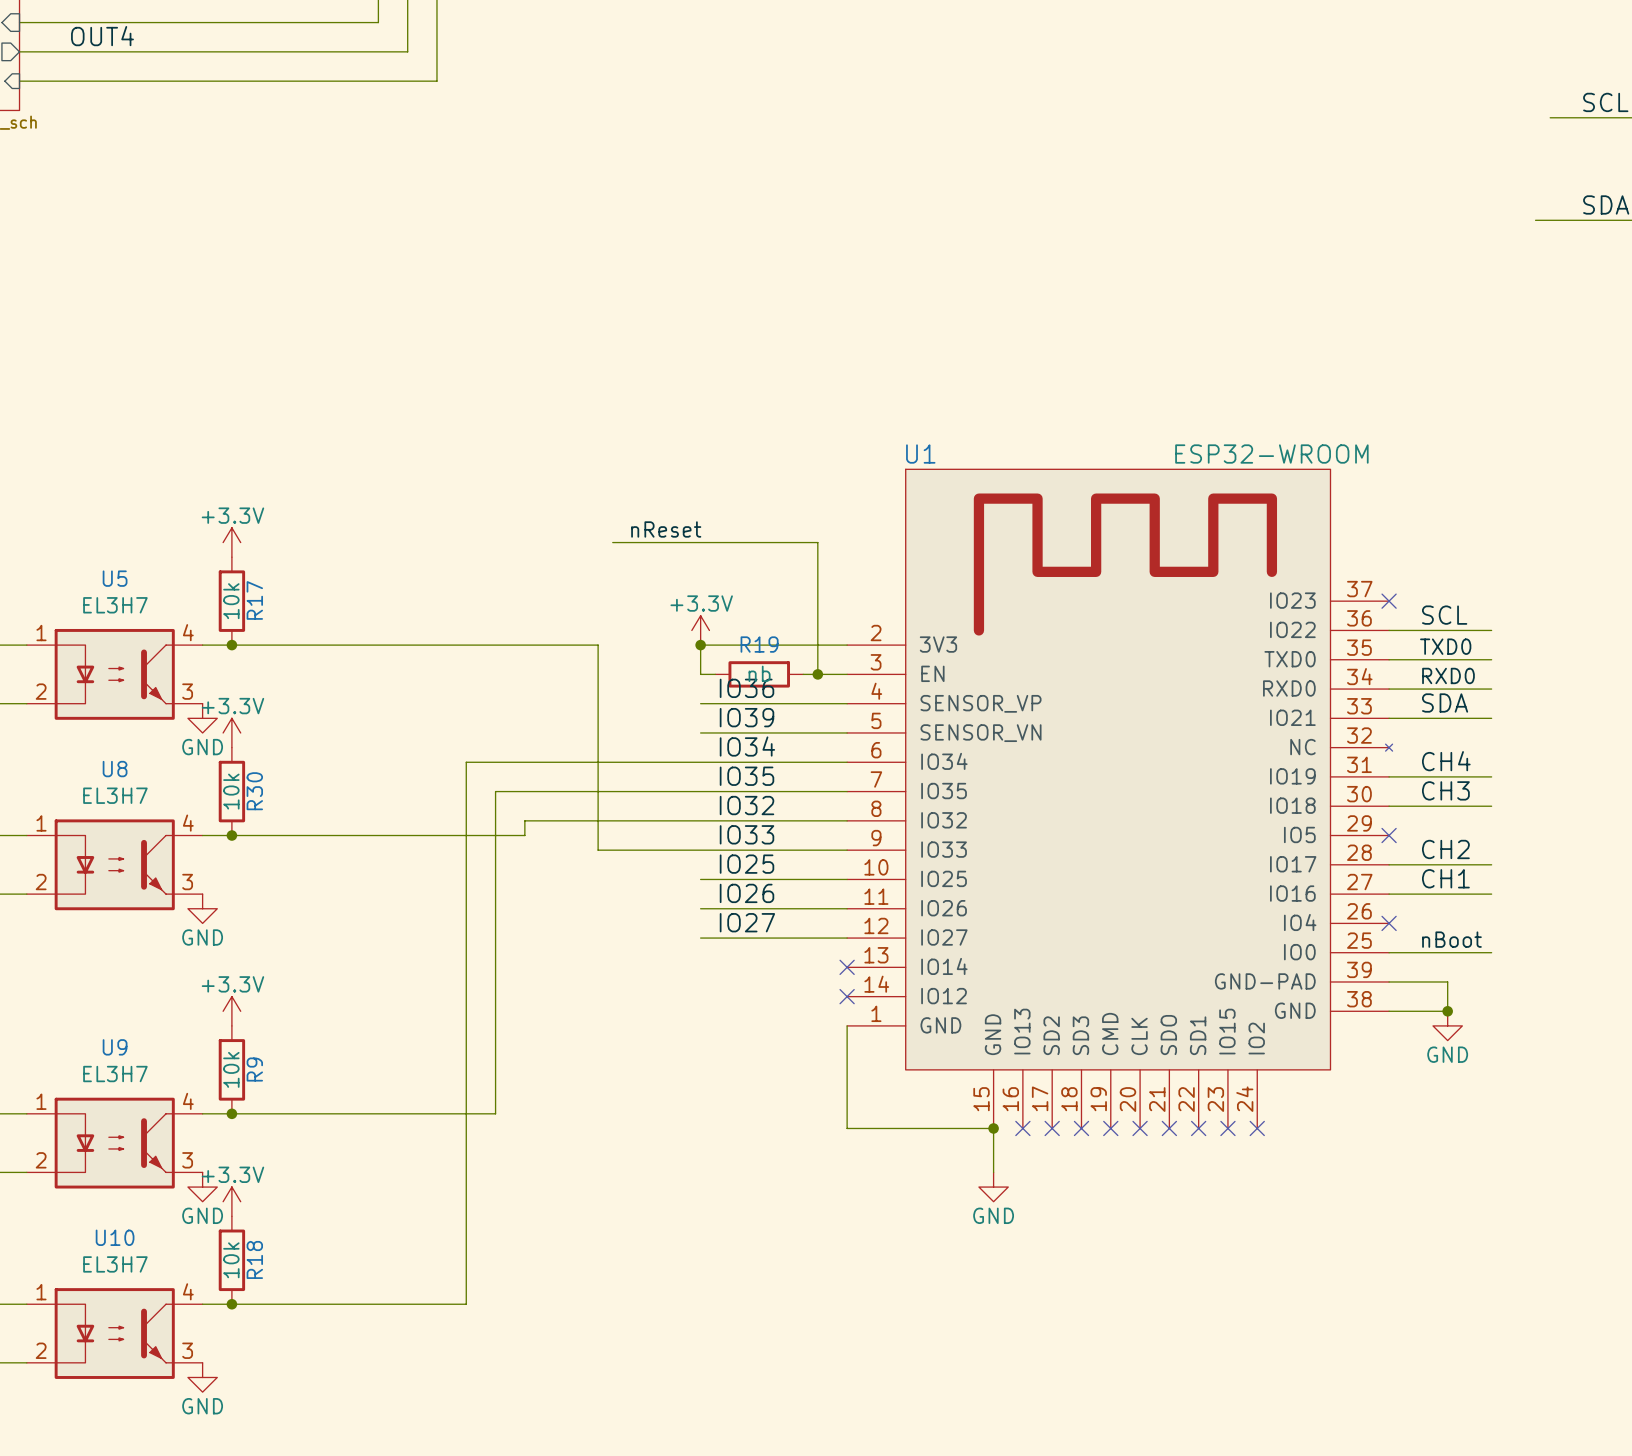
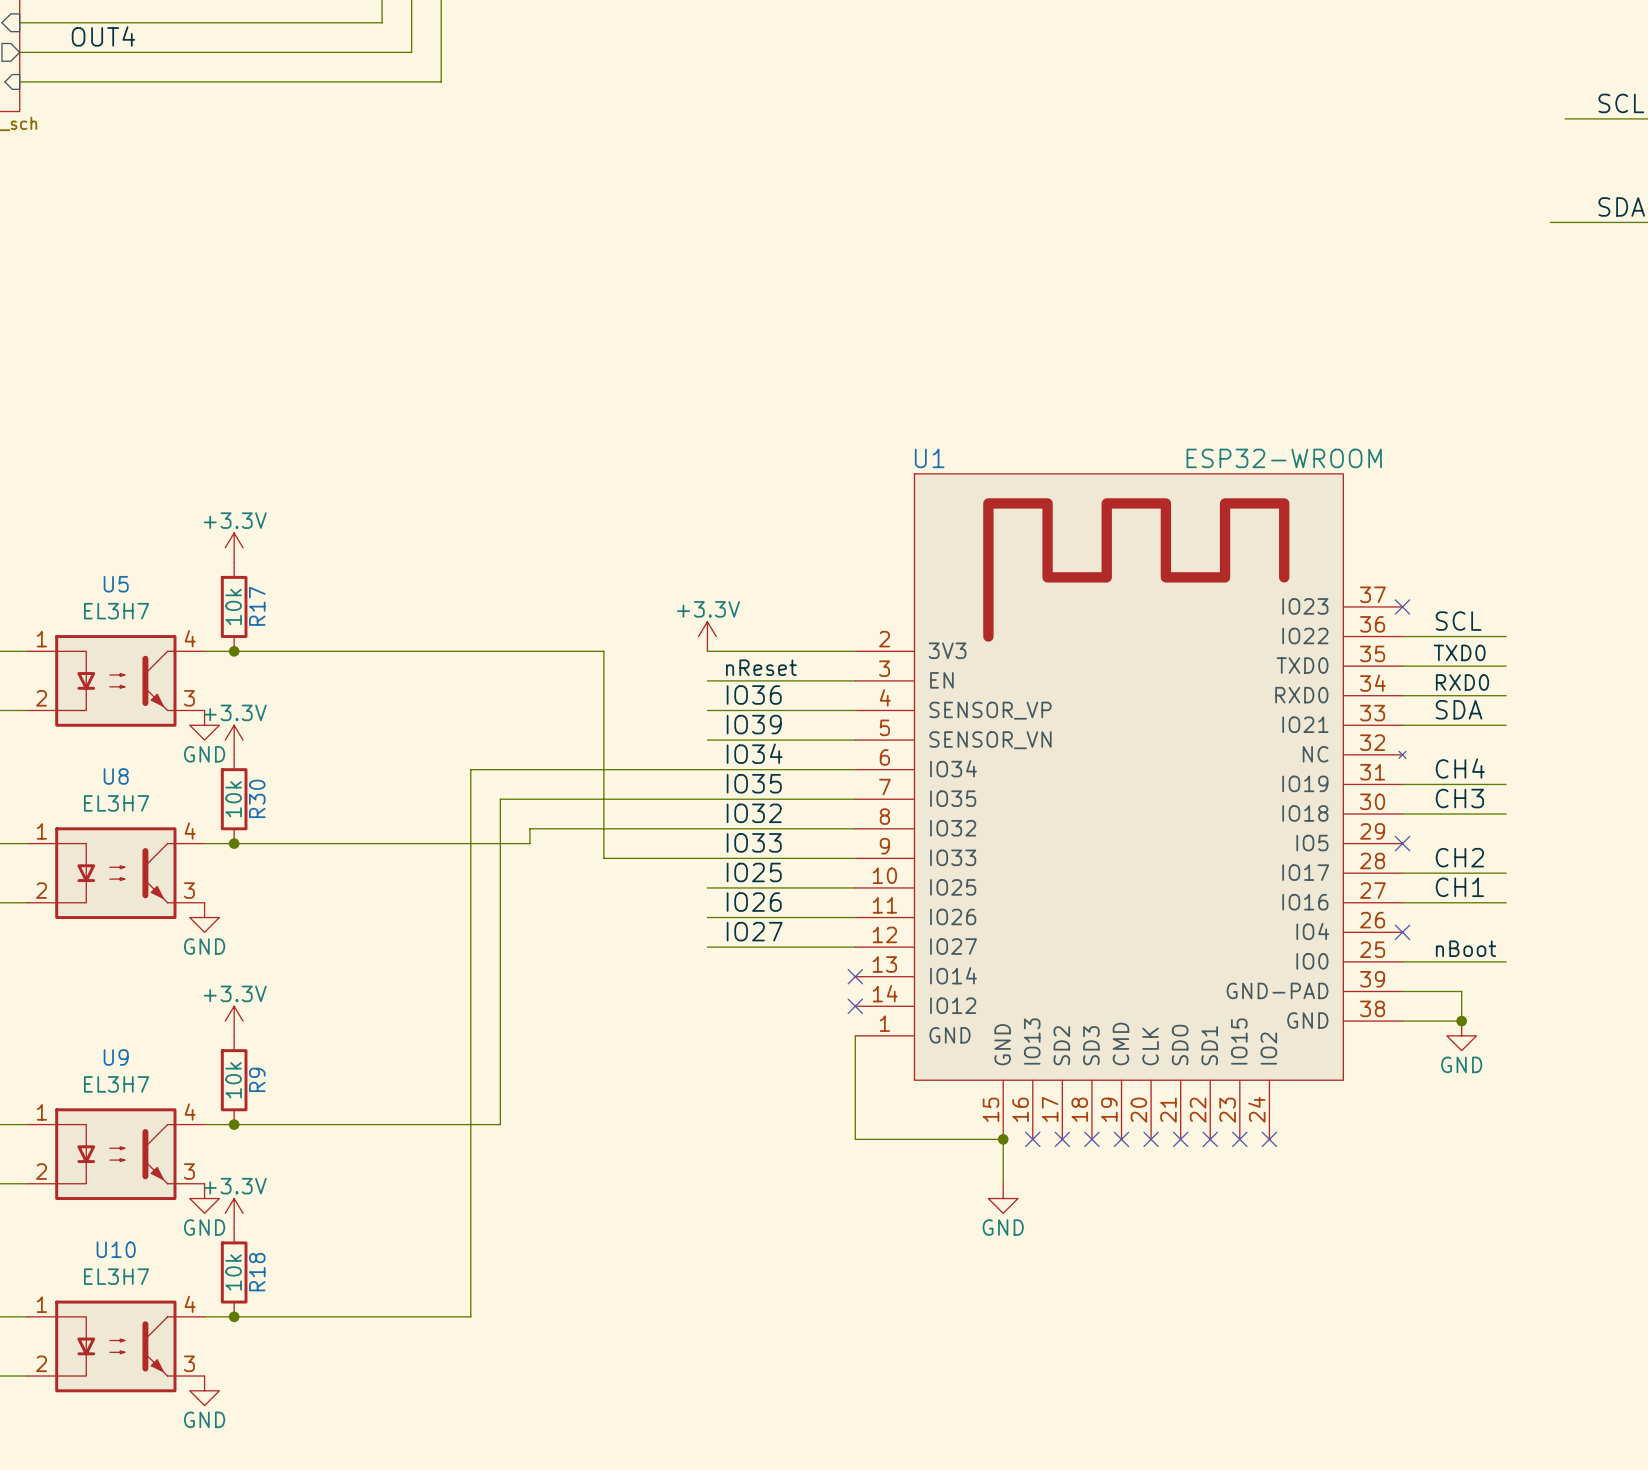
label position: nReset (666, 529) -> nReset (761, 667)
wire: (612, 542) (817, 542) (817, 674) -> none
wire: (700, 645) (700, 674) -> none
junction: (700, 645) -> none
wire: none -> (722, 680) (810, 680)
R19: nb (759, 674) -> none
junction: (817, 674) -> none

